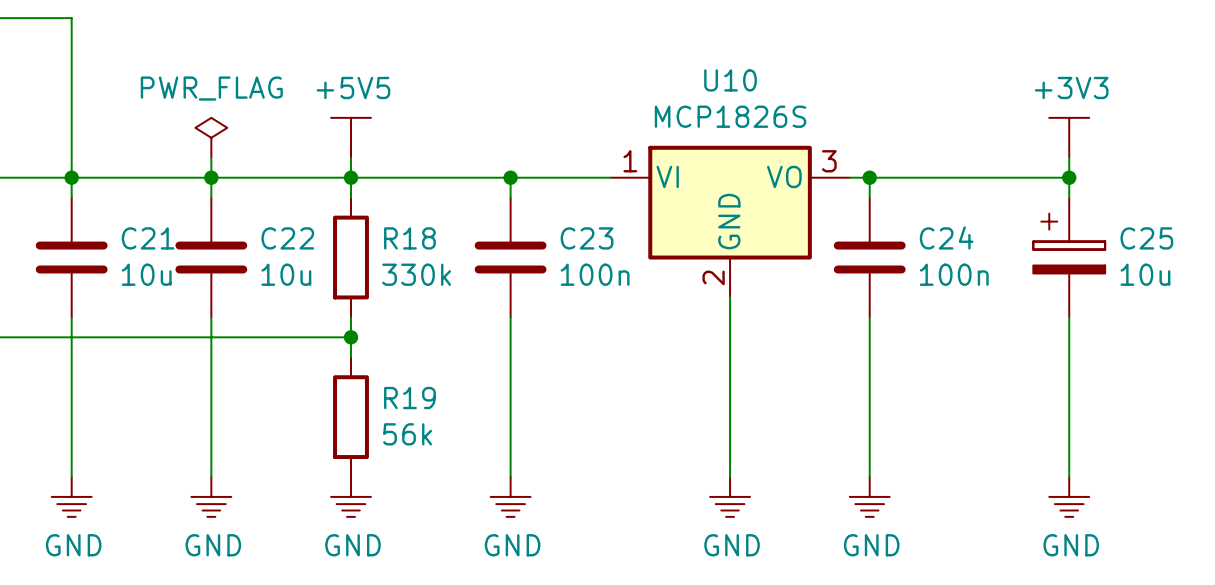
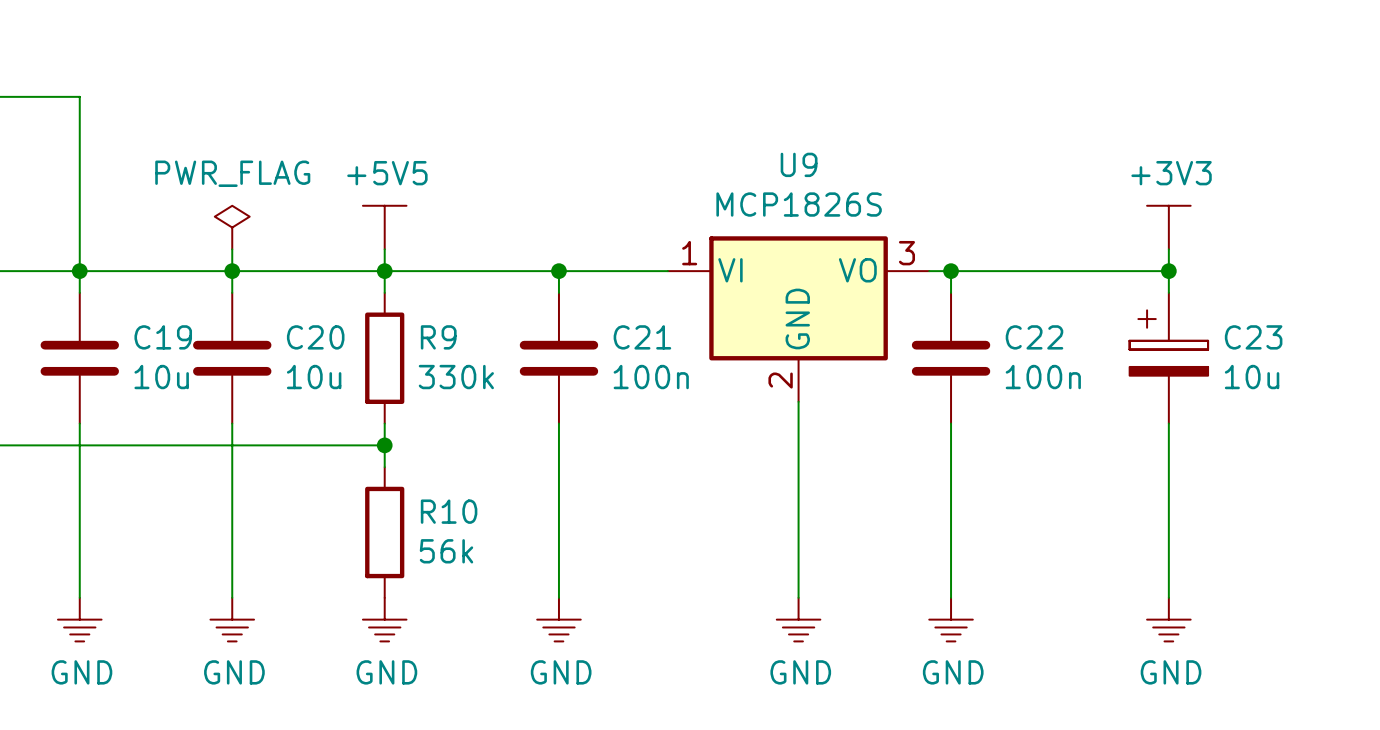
U10 name: U10 (730, 80) -> U9 (799, 164)
C24 name: C24 (946, 237) -> C22 (1034, 337)
C21 name: C21 (148, 238) -> C19 (163, 337)
C22 name: C22 (287, 238) -> C20 (315, 337)
R18 name: R18 (409, 238) -> R9 (438, 337)
C23 name: C23 (587, 238) -> C21 (642, 337)
C25 name: C25 (1146, 238) -> C23 (1253, 337)
R19 name: R19 (409, 398) -> R10 (449, 511)

